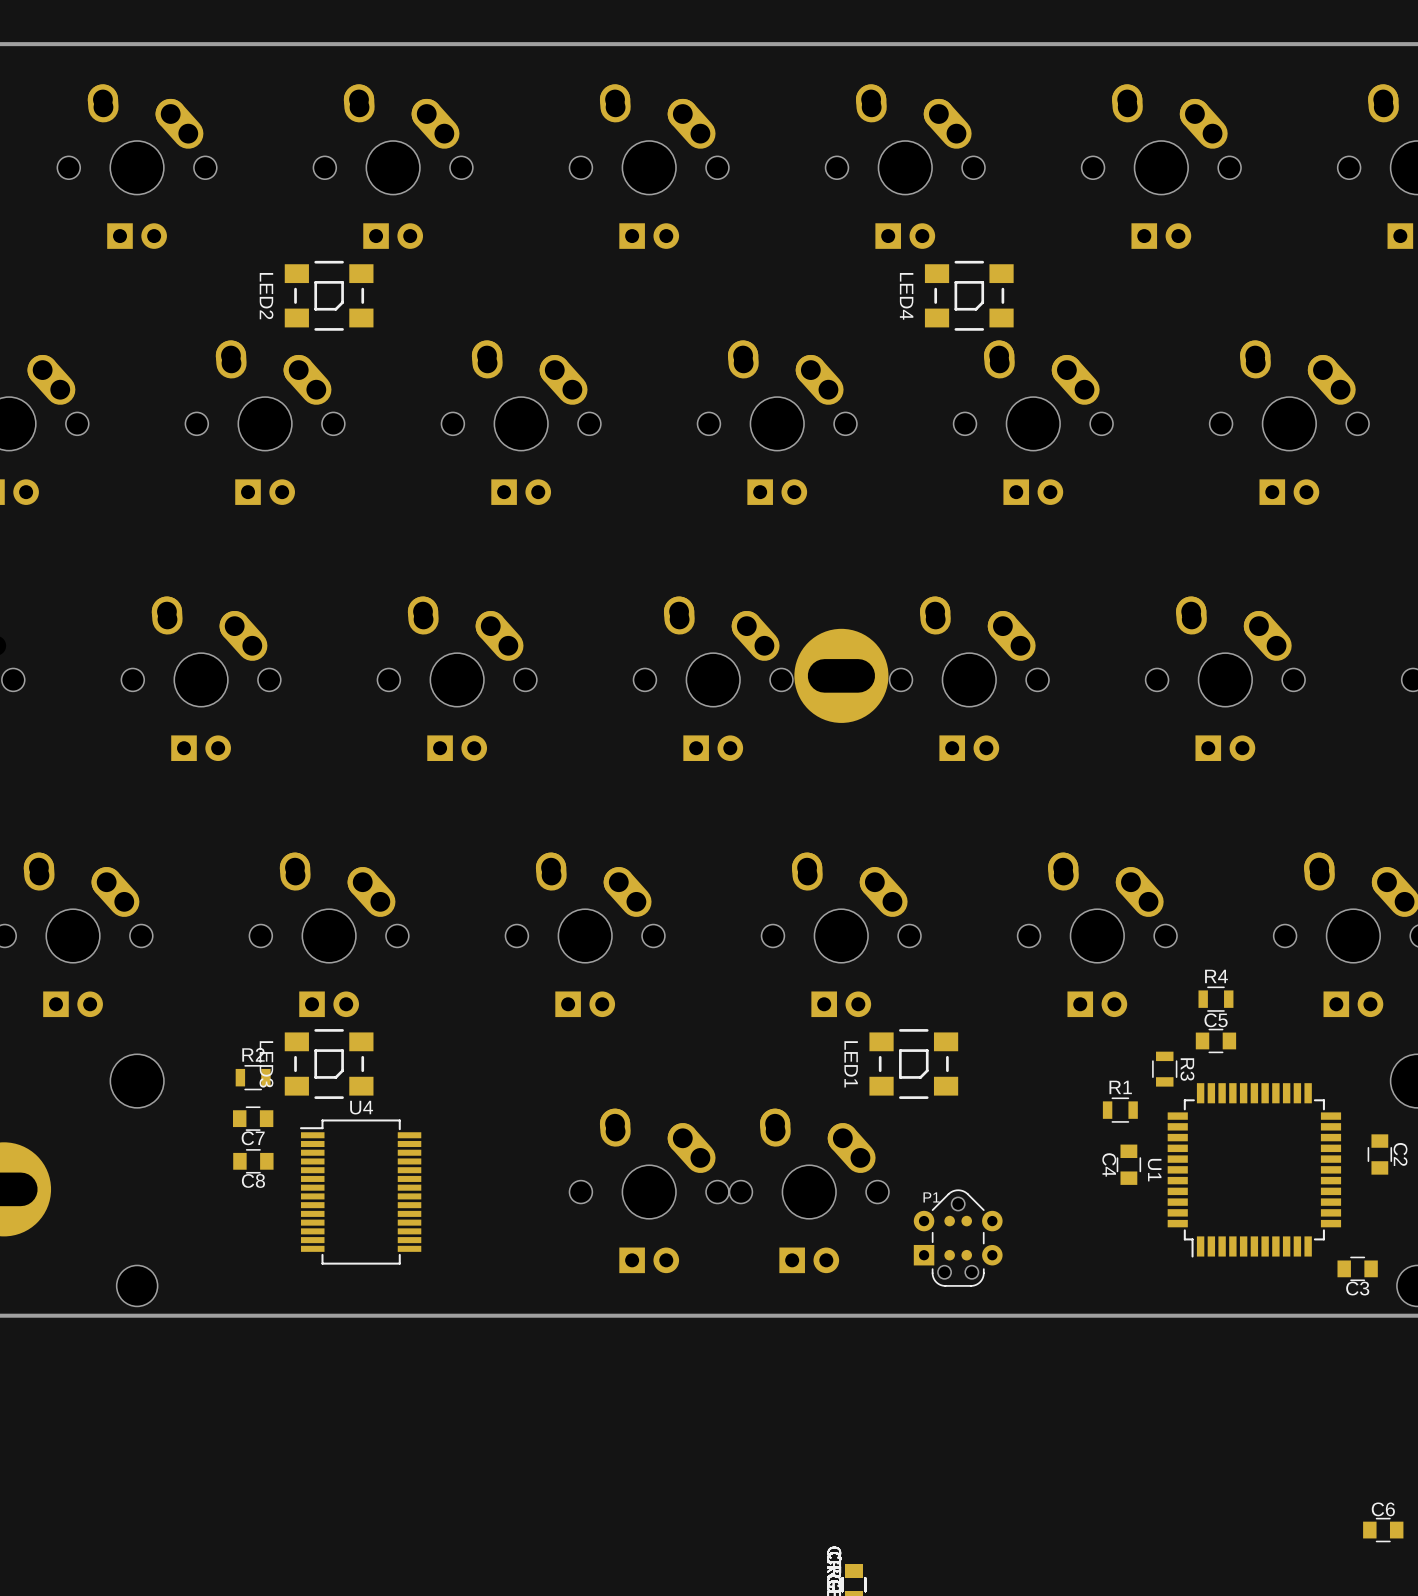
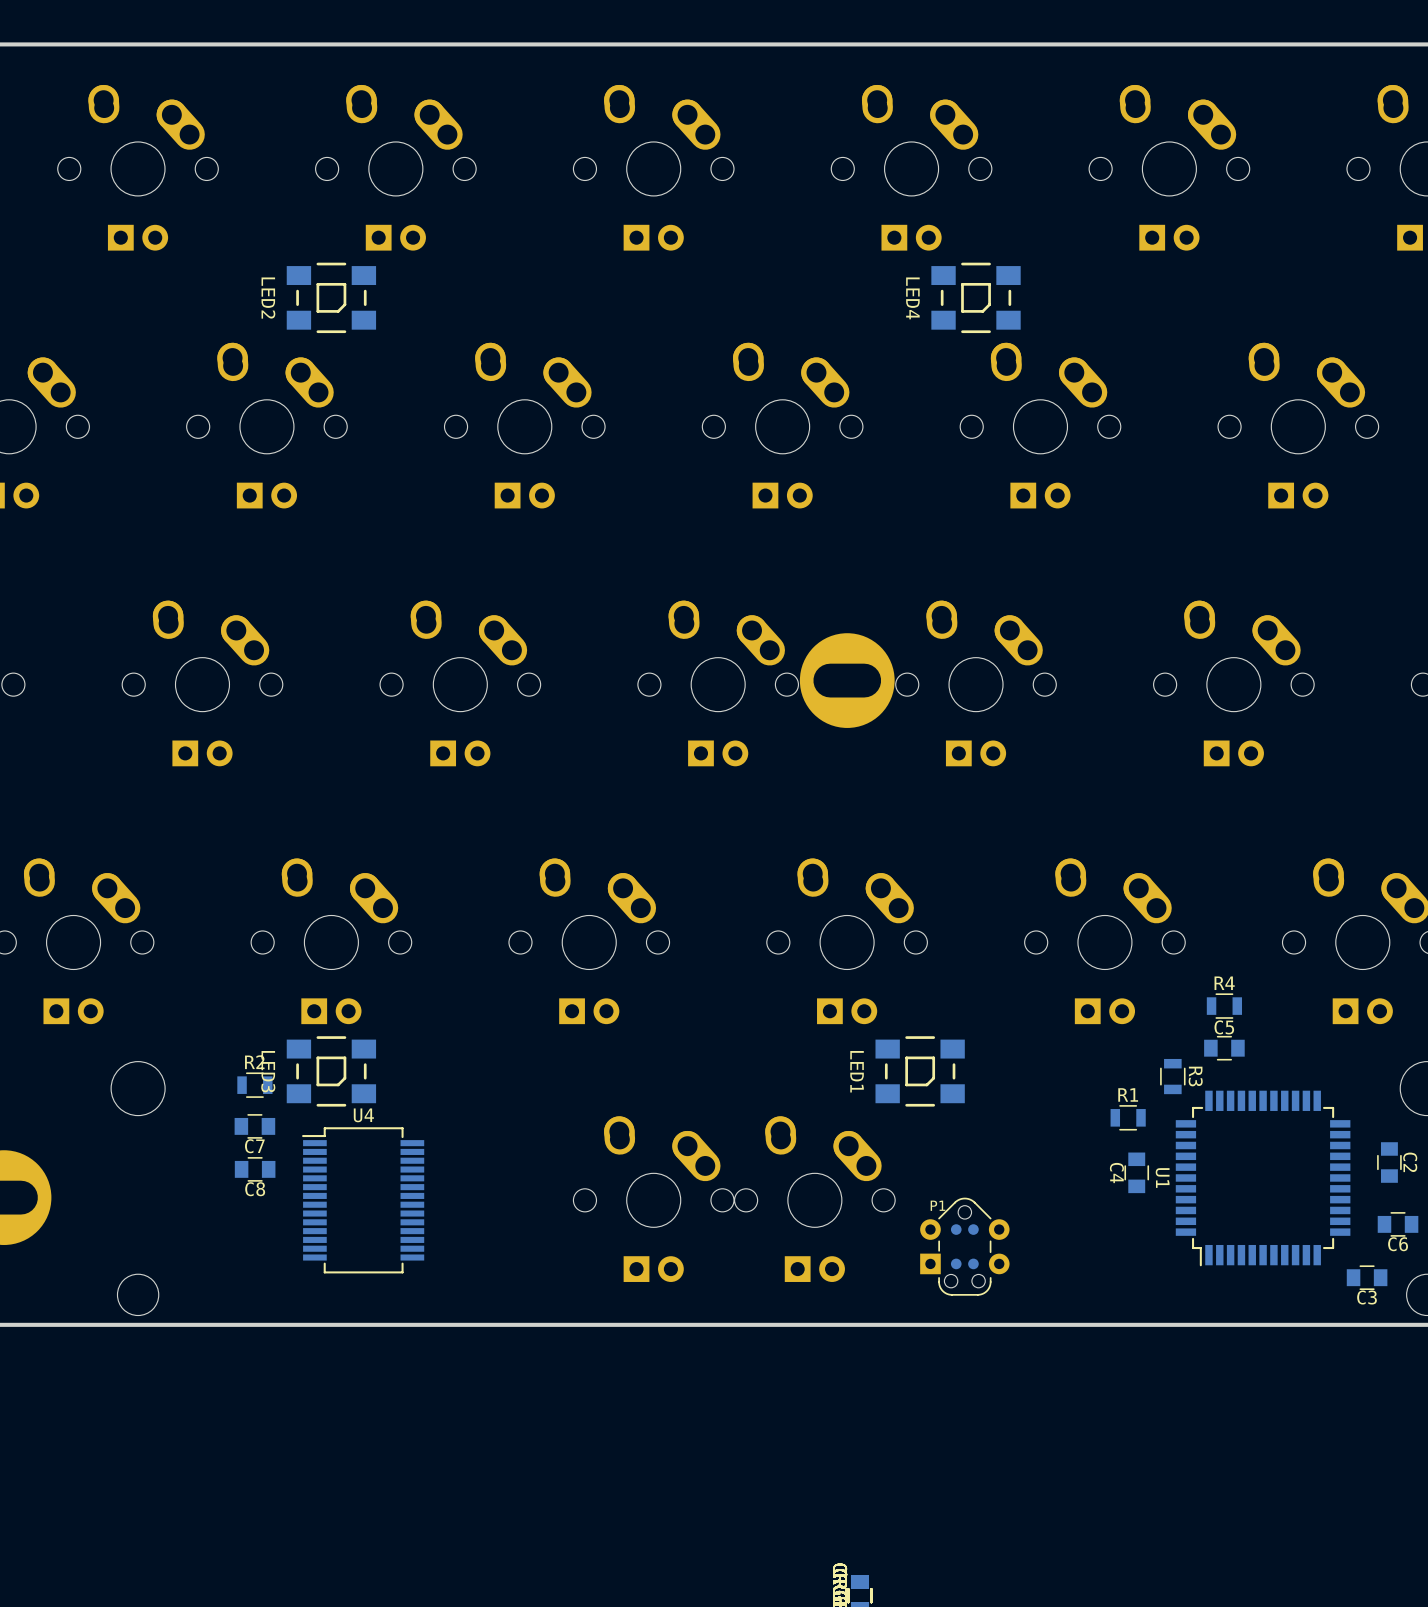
C6 name position: C6 (1383, 1509) -> C6 (1398, 1244)
C6 position: (1383, 1530) -> (1398, 1224)

